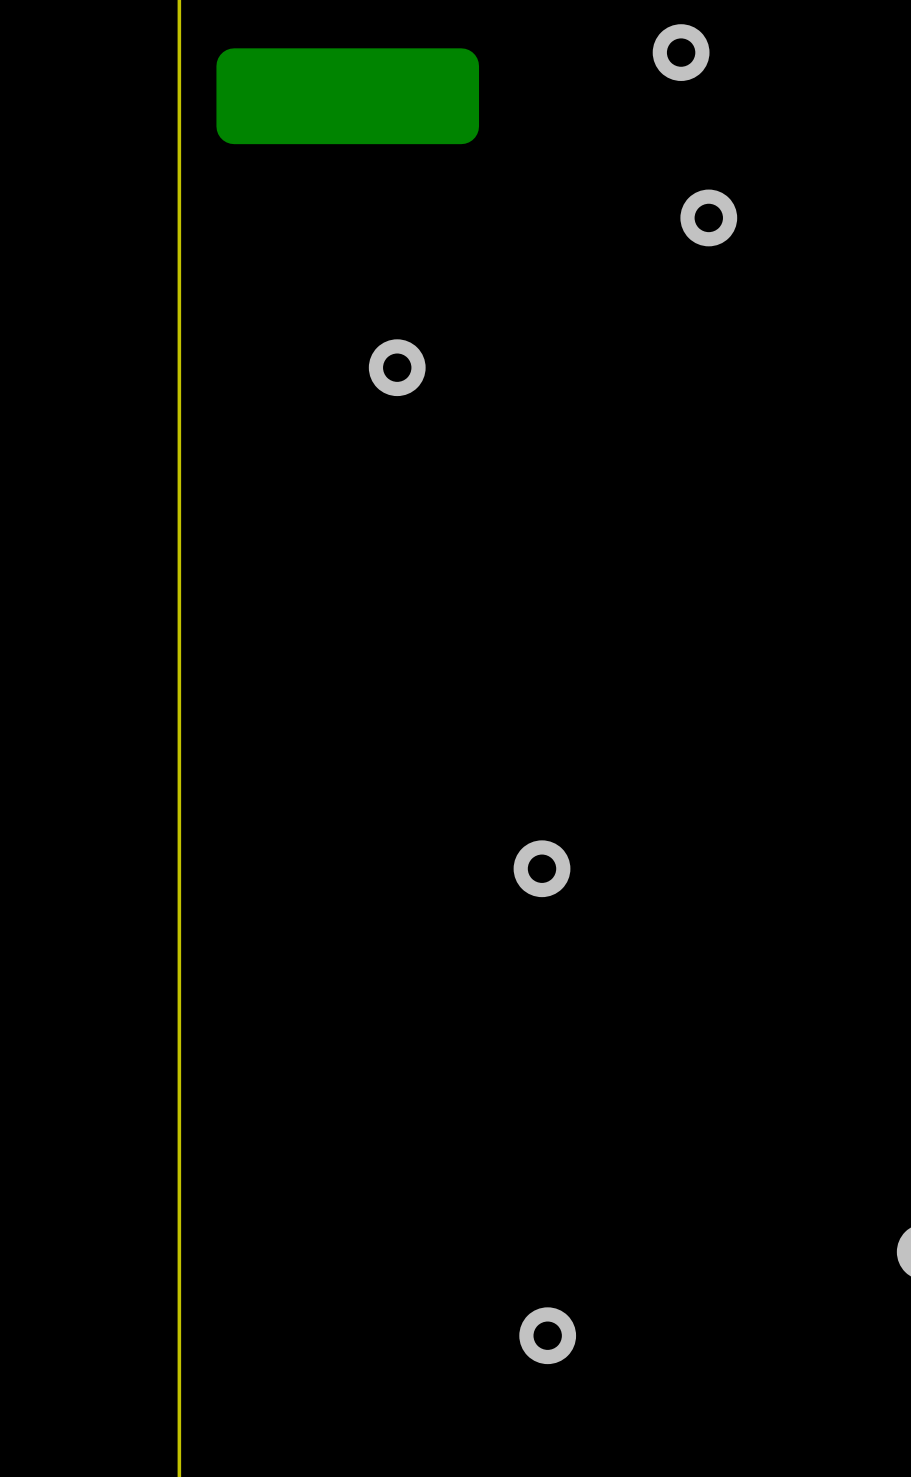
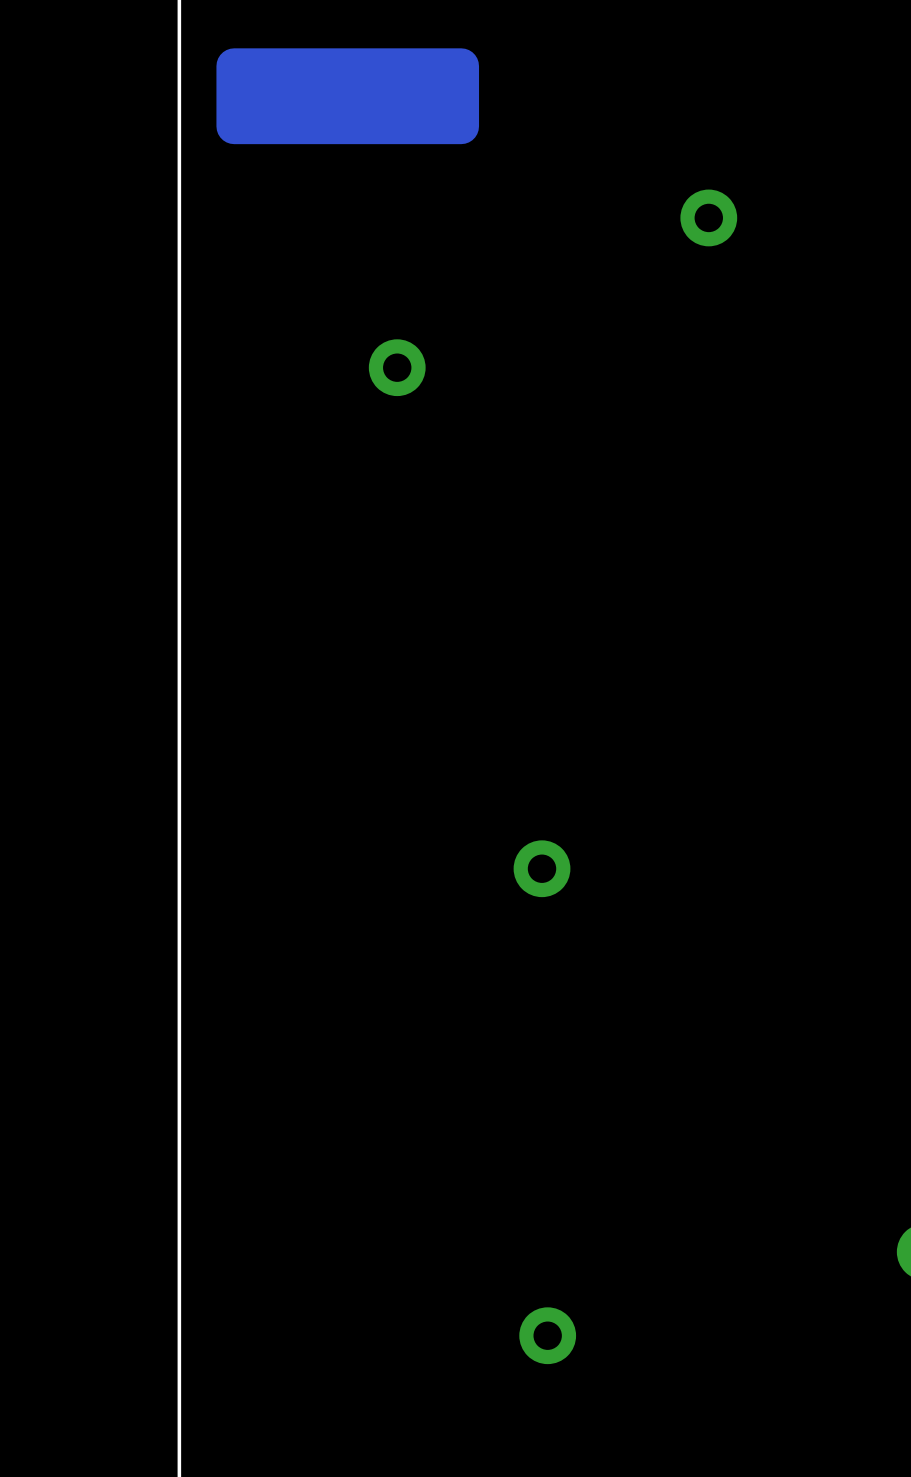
via: (681, 52) -> none

